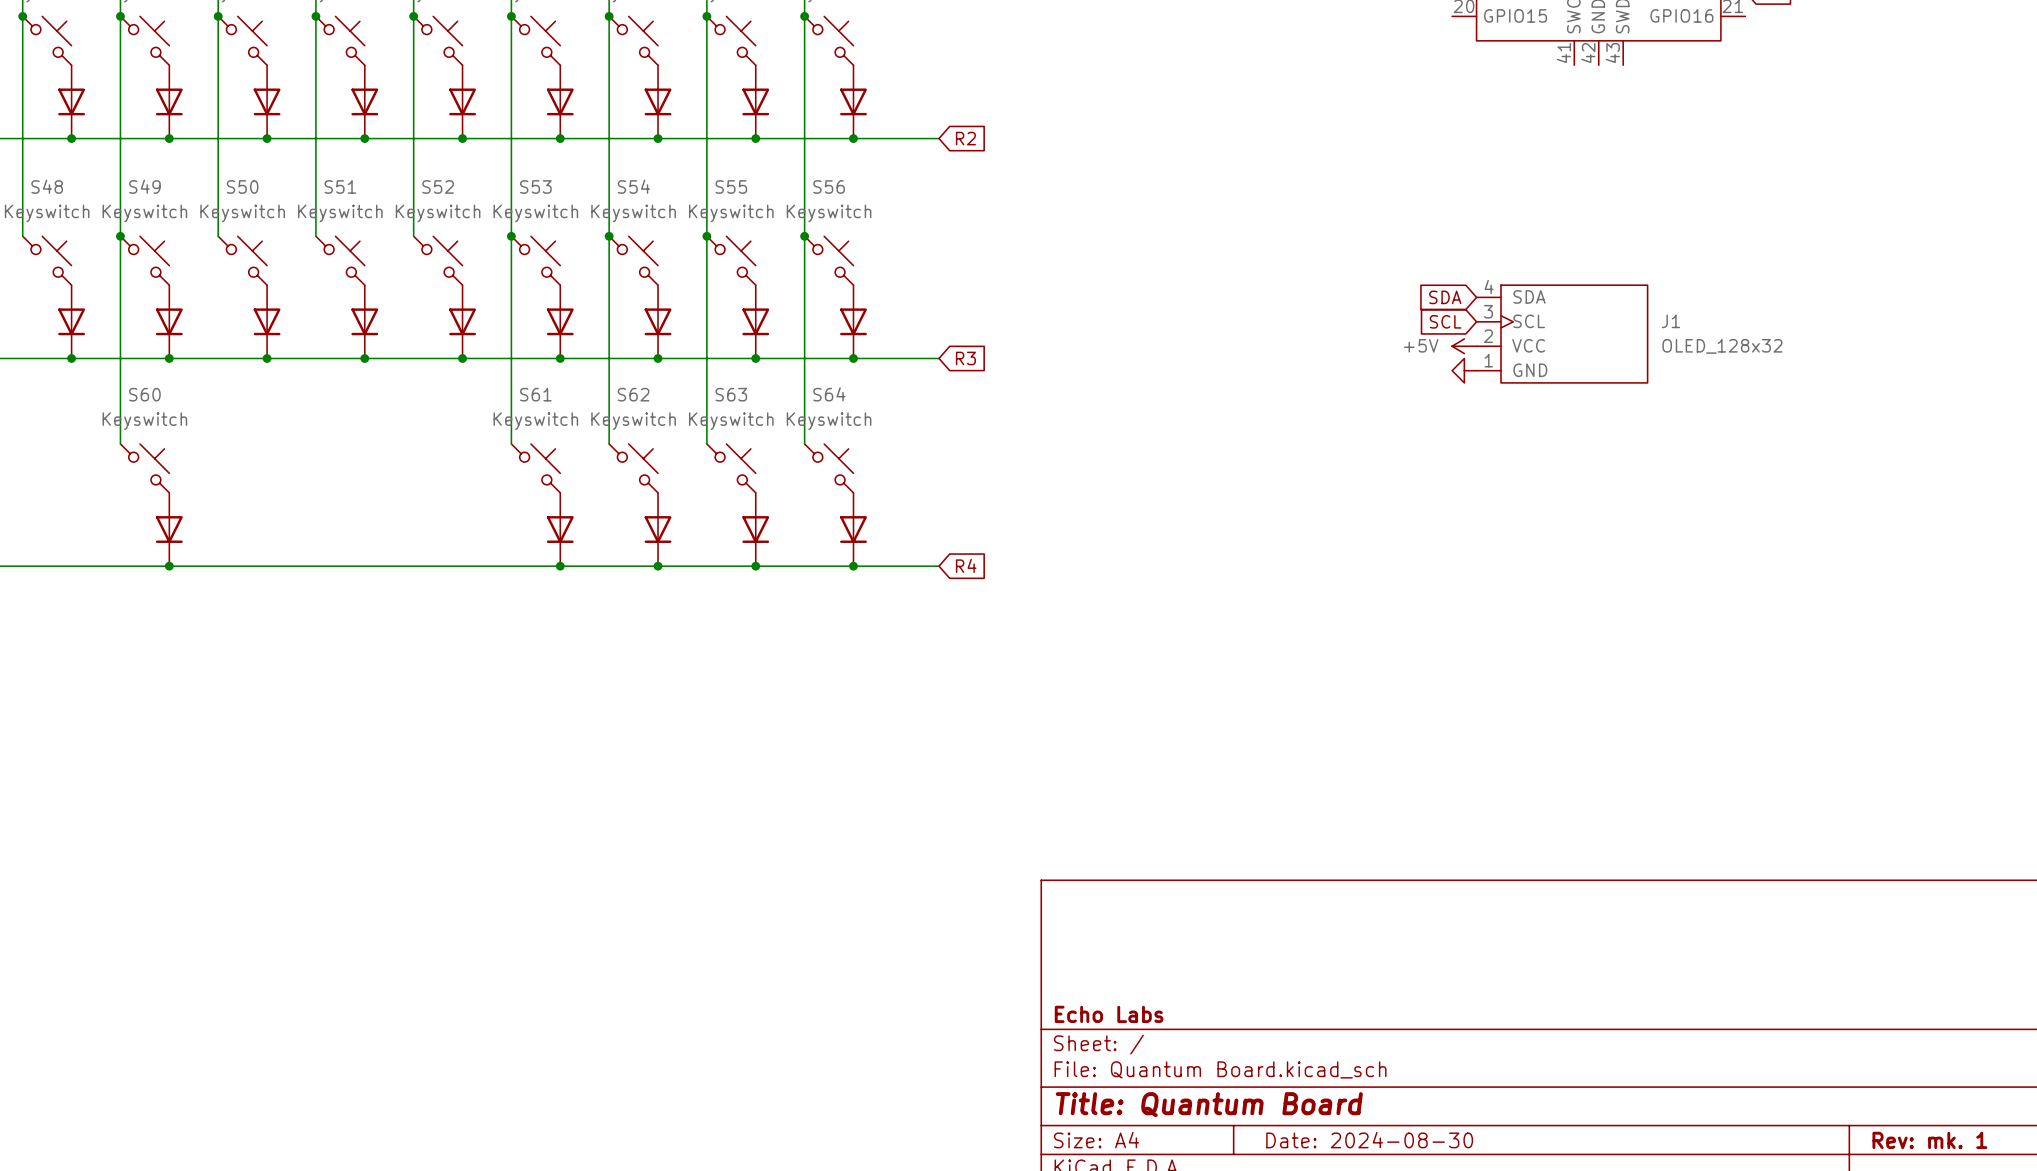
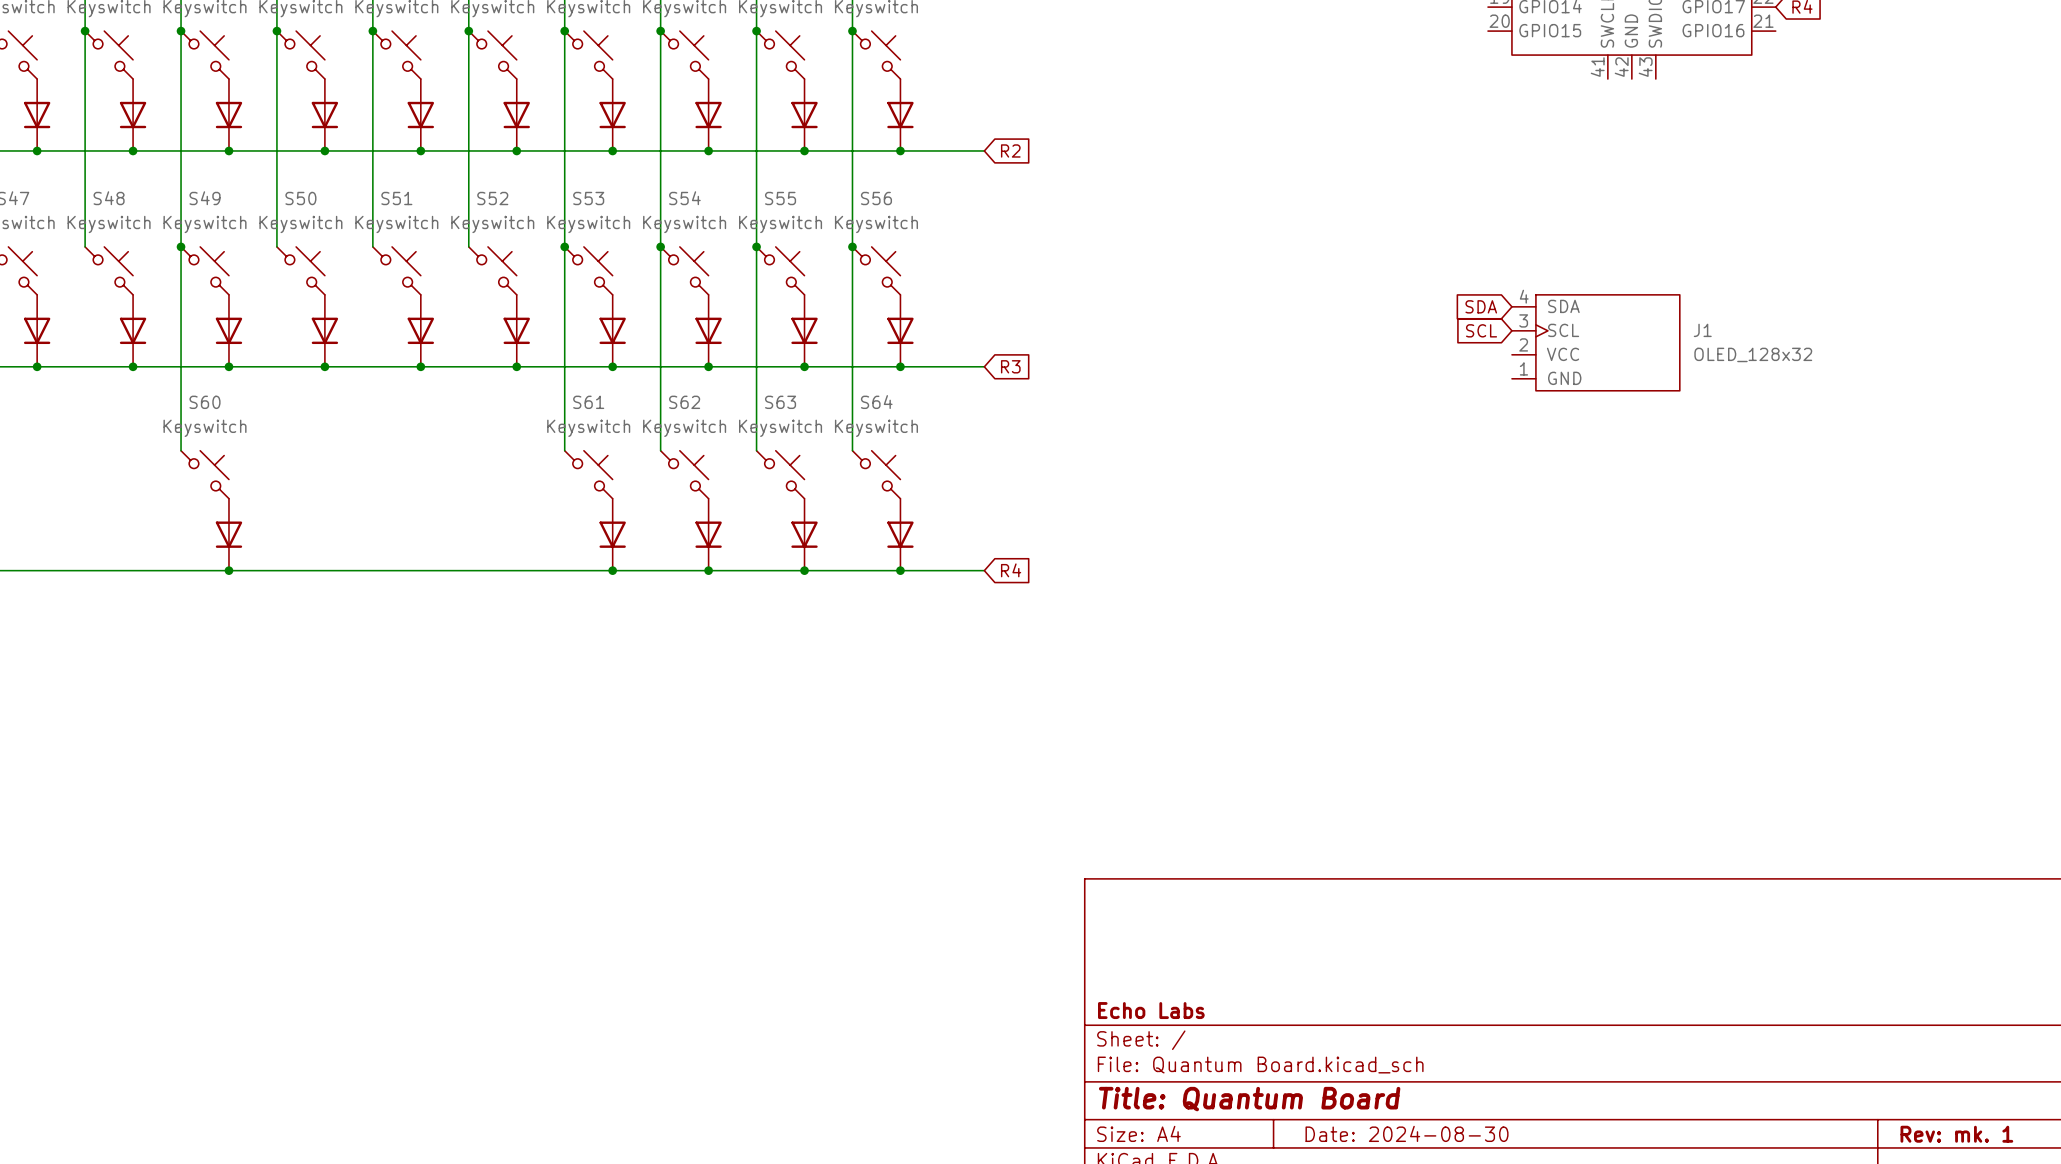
power symbol: +5V (1464, 346) -> none
power symbol: (1464, 370) -> none

